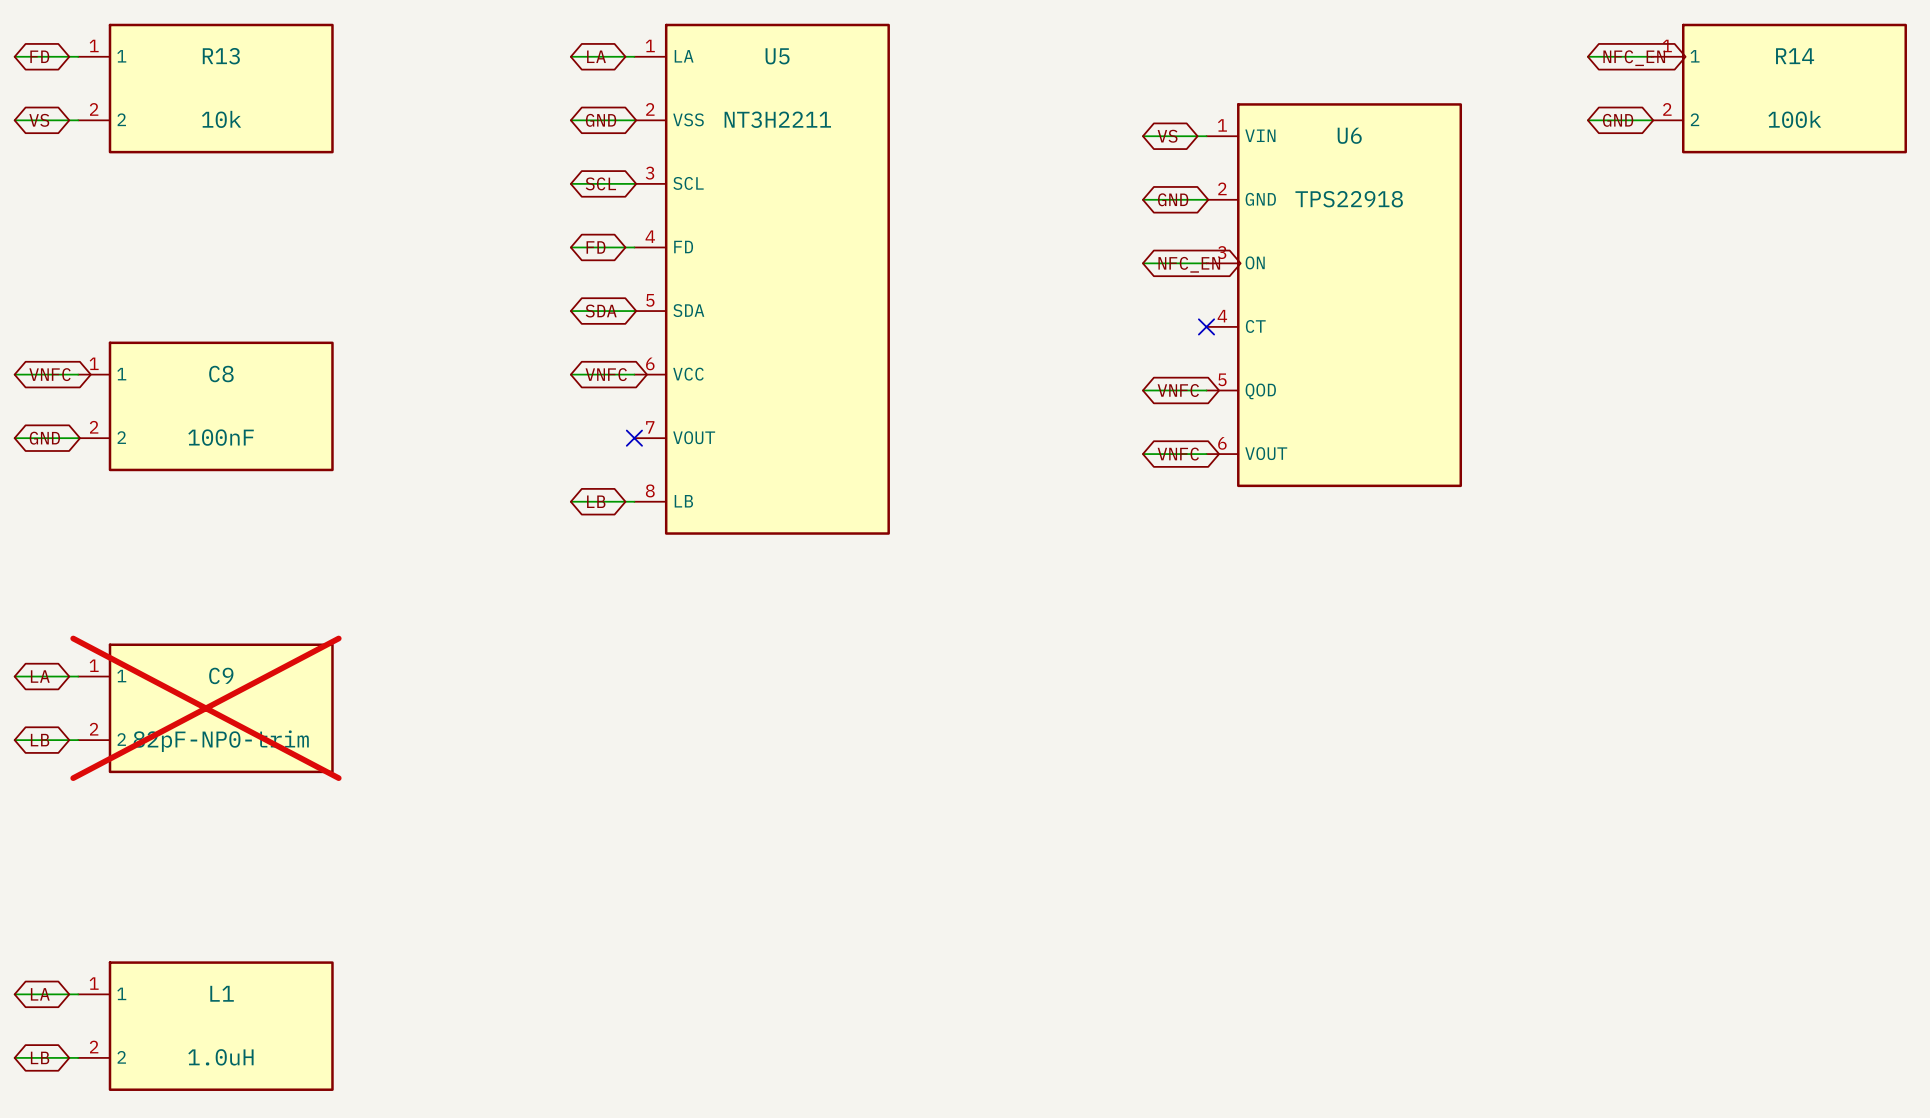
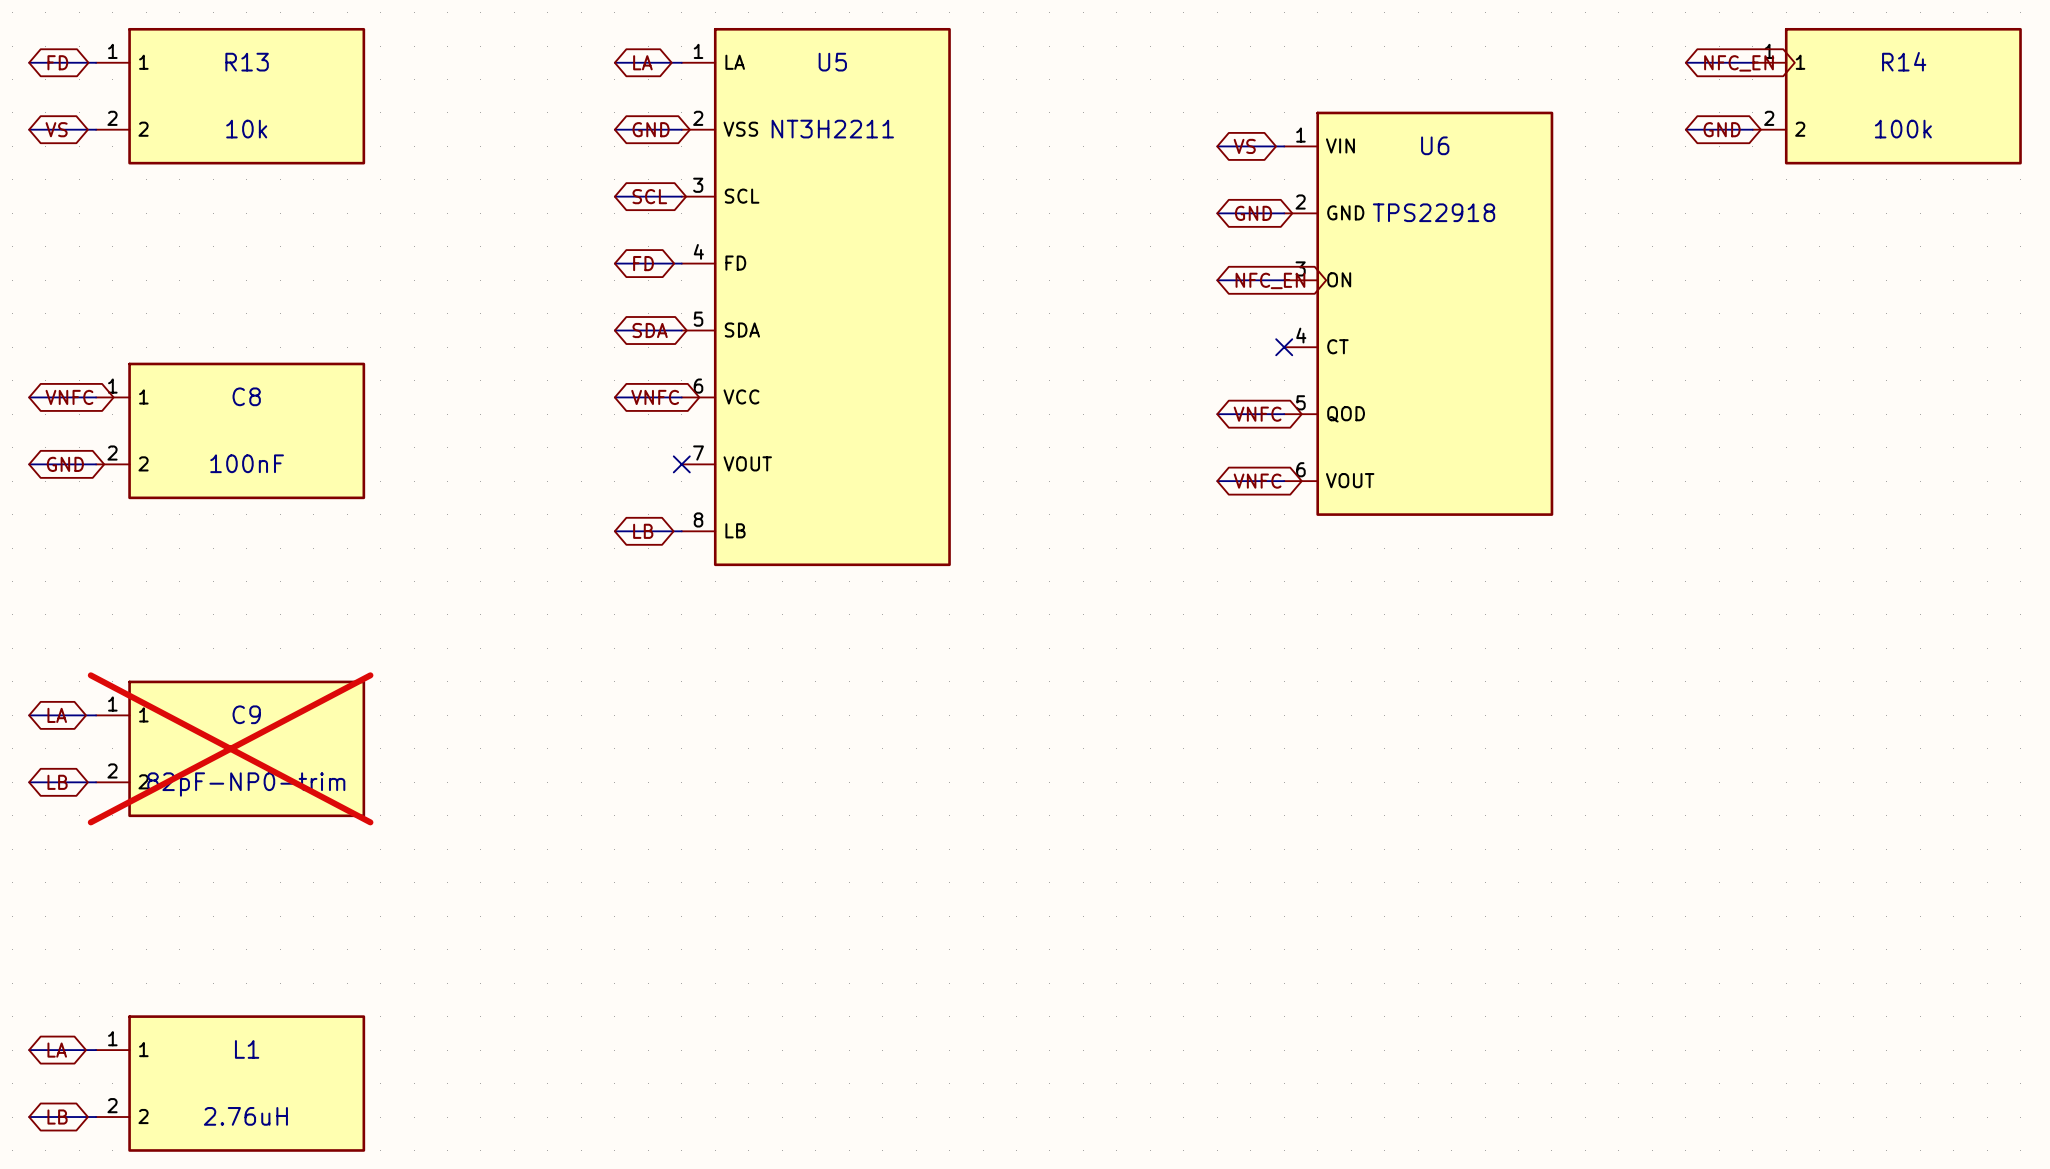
L1 value: 1.0uH (220, 1057) -> 2.76uH (245, 1116)

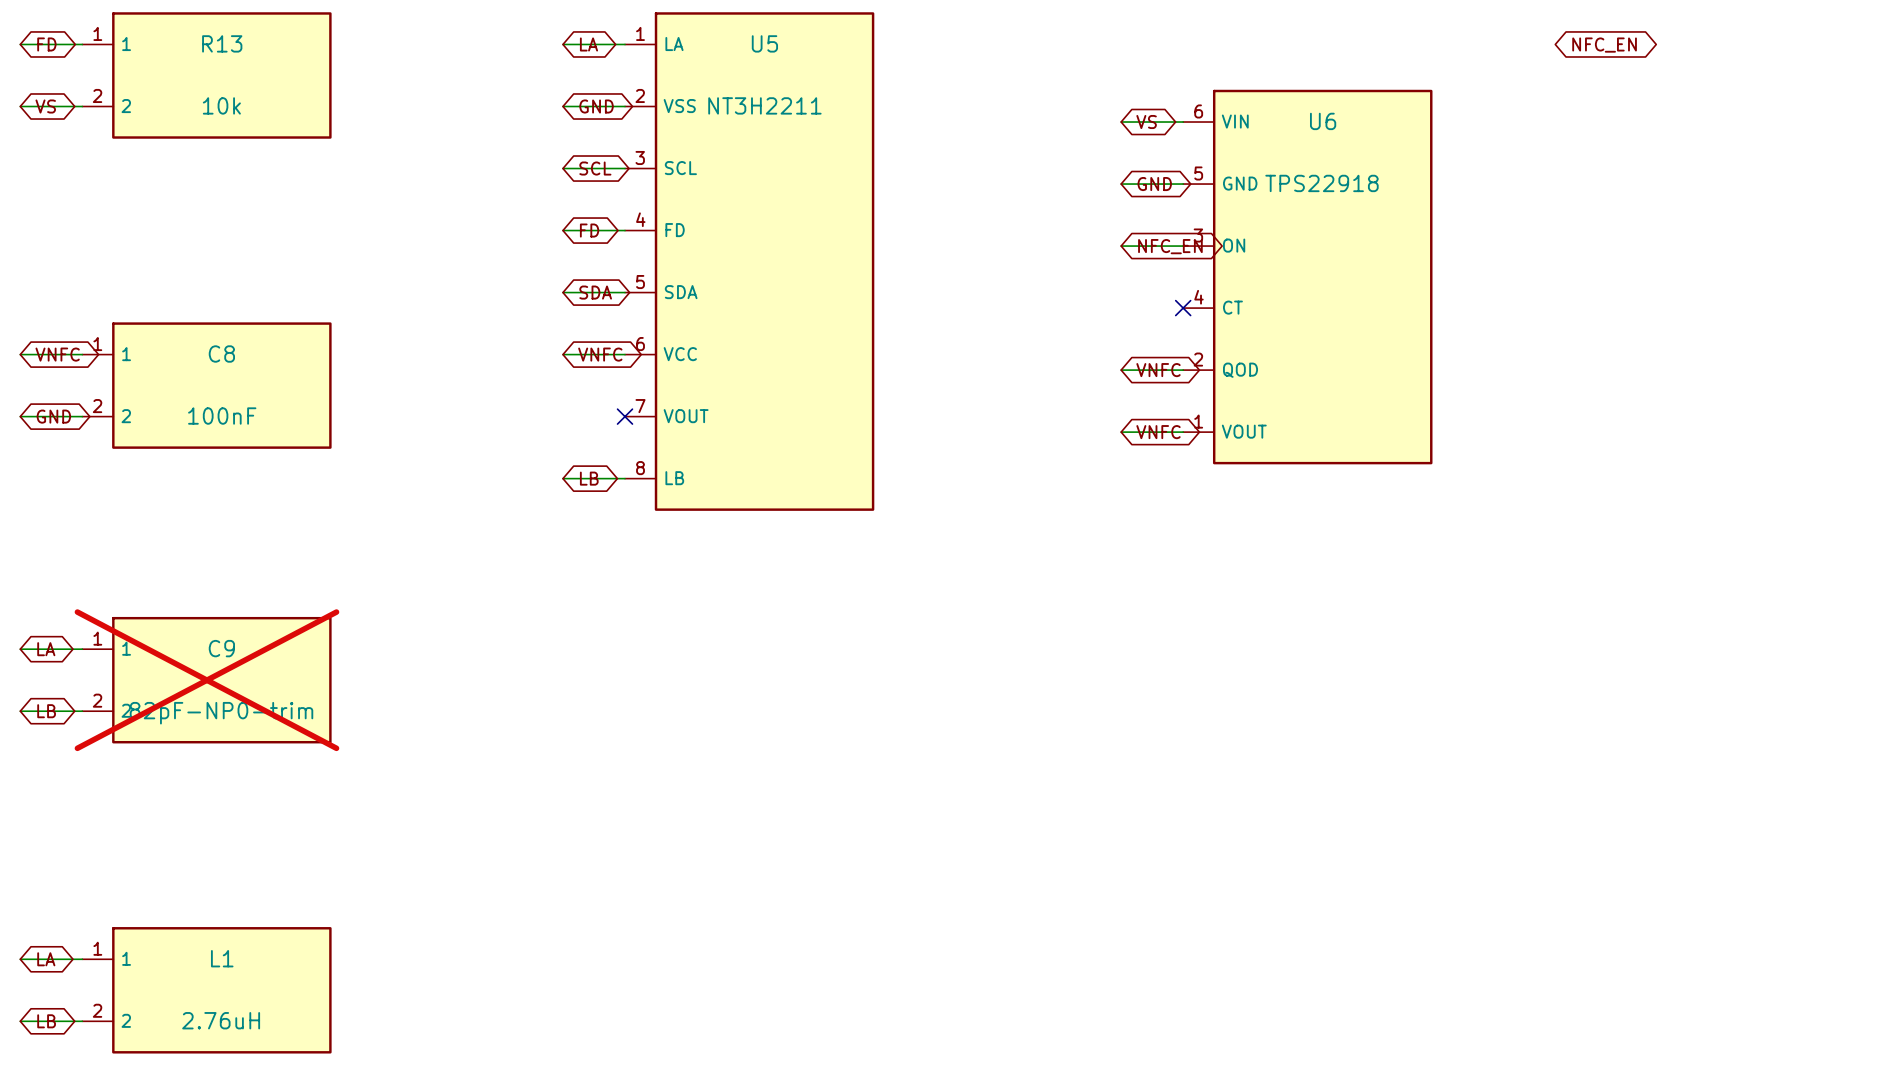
wire: (1685, 62) (1752, 62) -> none
R14: 100k (1887, 96) -> none
wire: (1685, 129) (1752, 129) -> none
global label: GND (1722, 129) -> none
U6 pin number: 1 (1300, 135) -> 6 (1198, 111)
U6 pin number: 2 (1300, 202) -> 5 (1198, 173)
U6 pin number: 5 (1300, 402) -> 2 (1198, 359)
U6 pin number: 6 (1300, 469) -> 1 (1198, 421)

